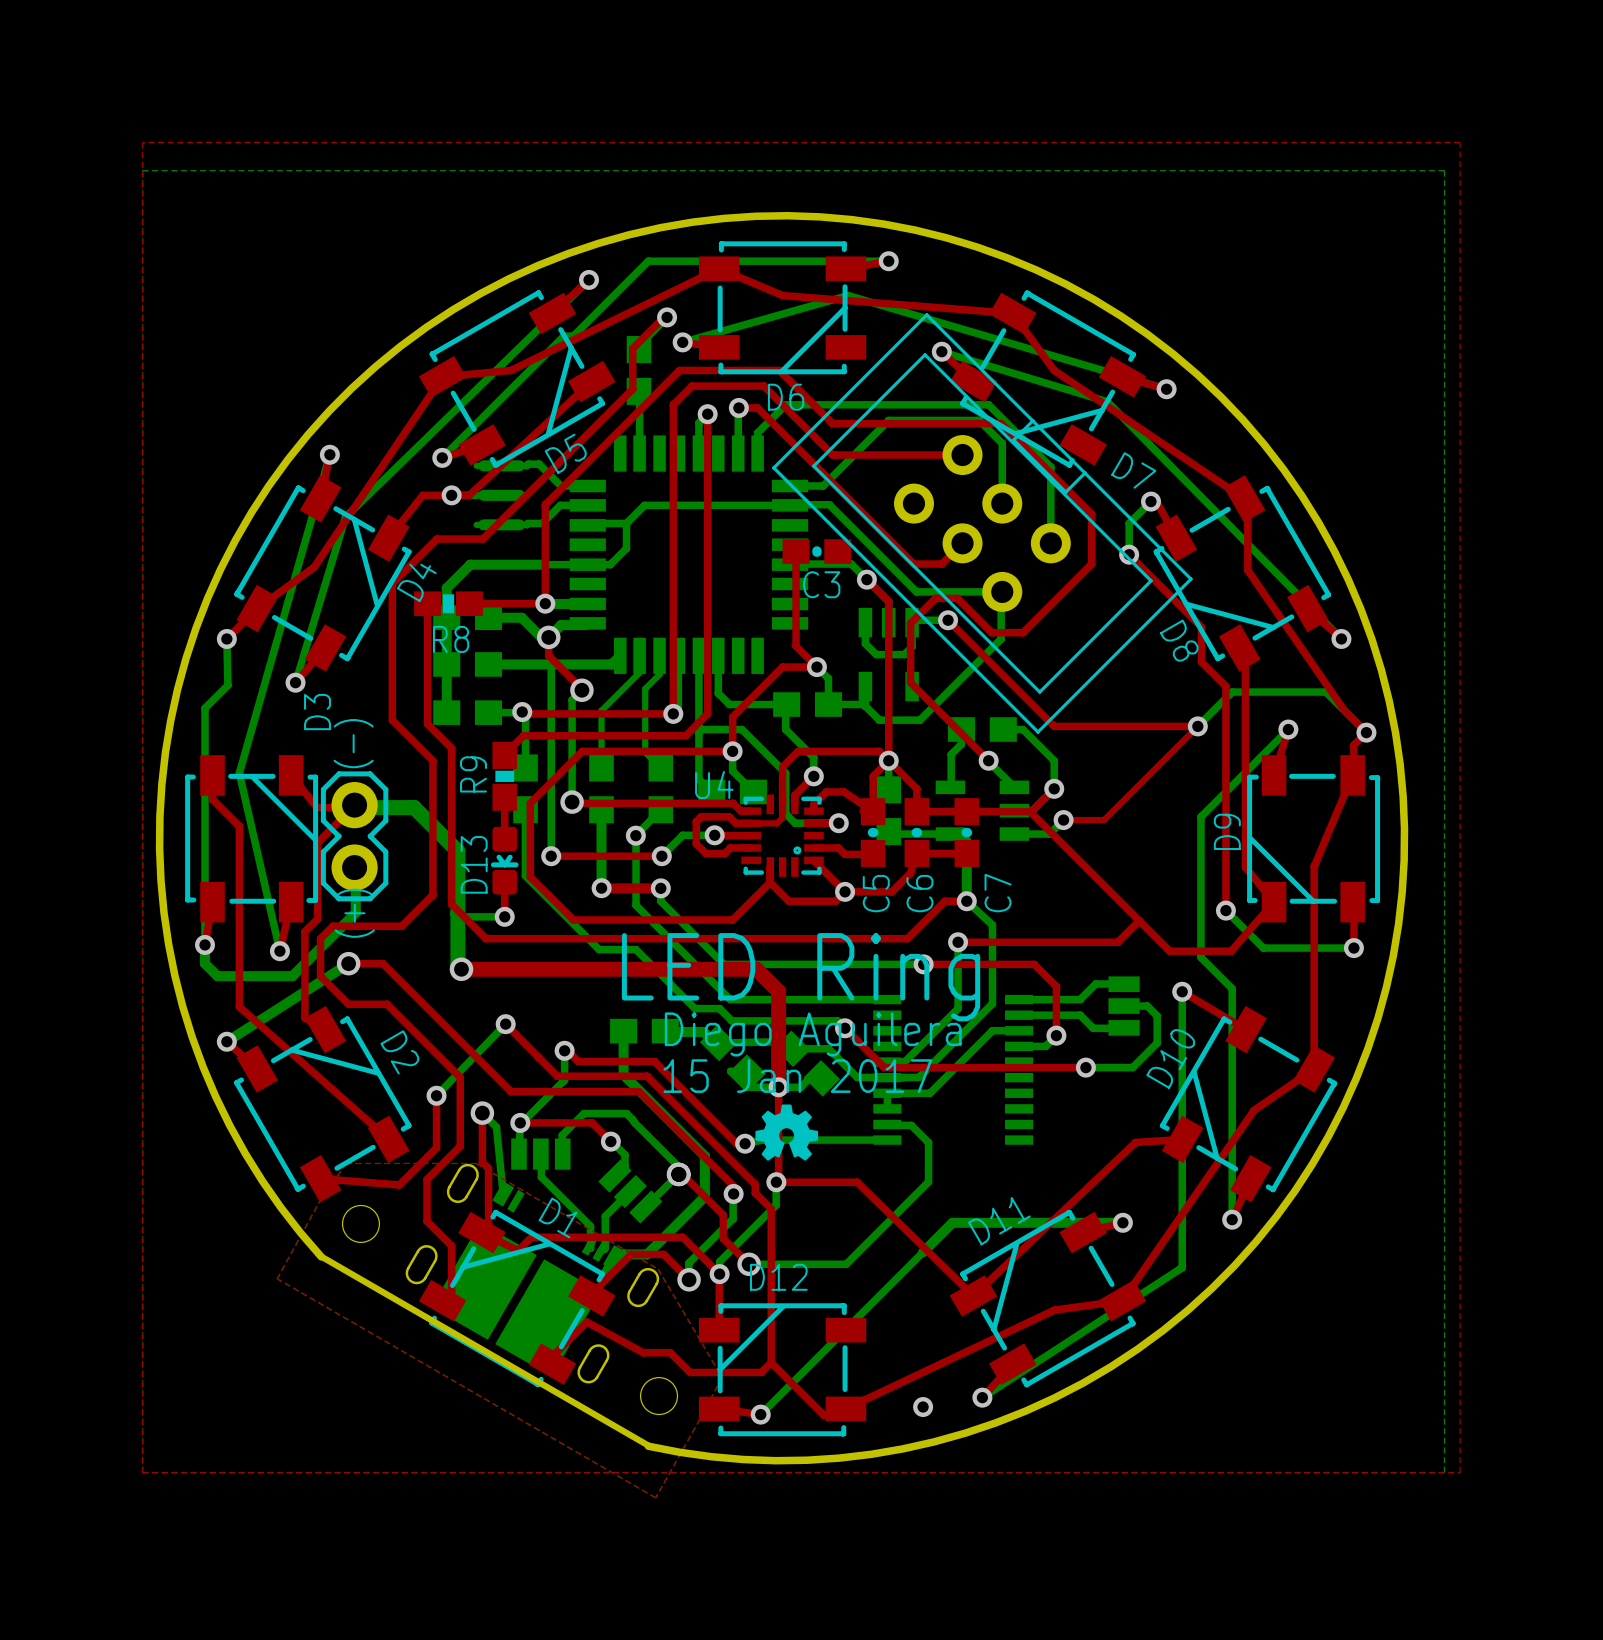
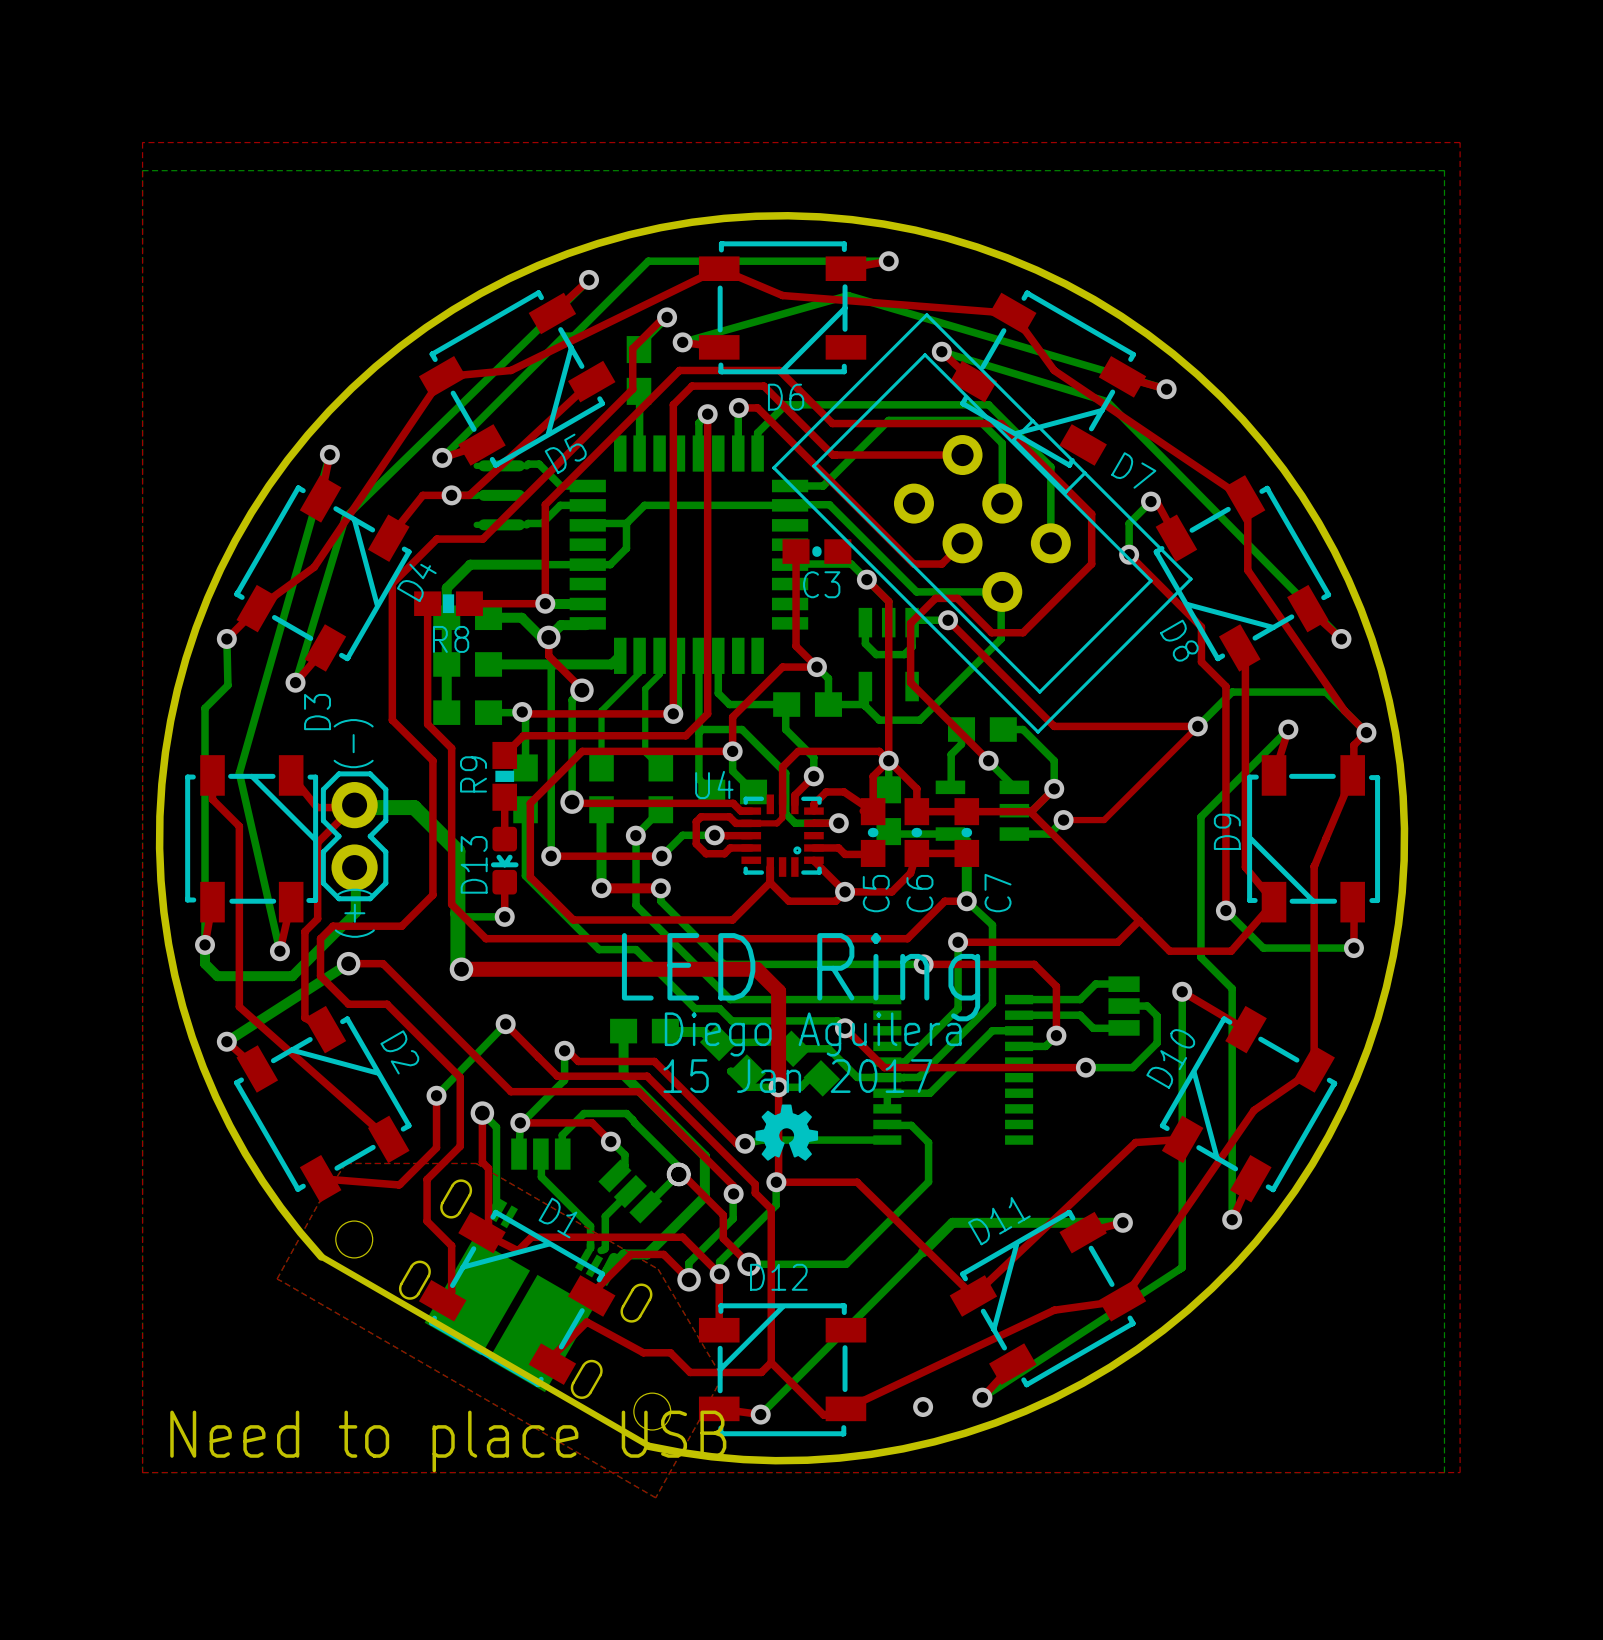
bottom track: (496, 1127) (503, 1193) -> (496, 1127) (496, 1209)
part position: (509, 1289) -> (503, 1304)
text: none -> Need to place USB (448, 1441)

